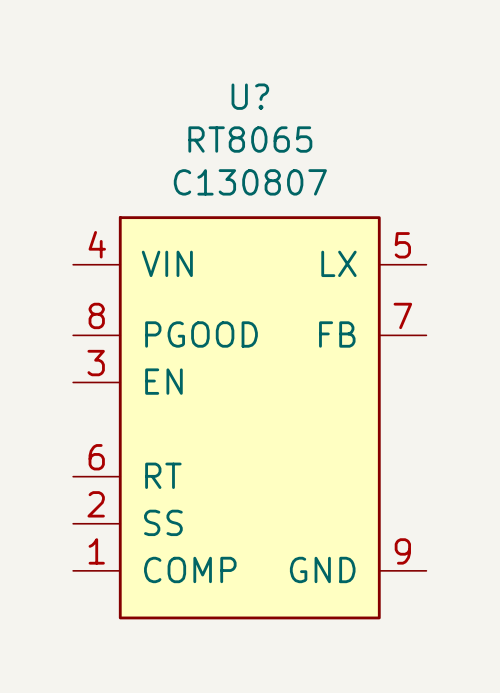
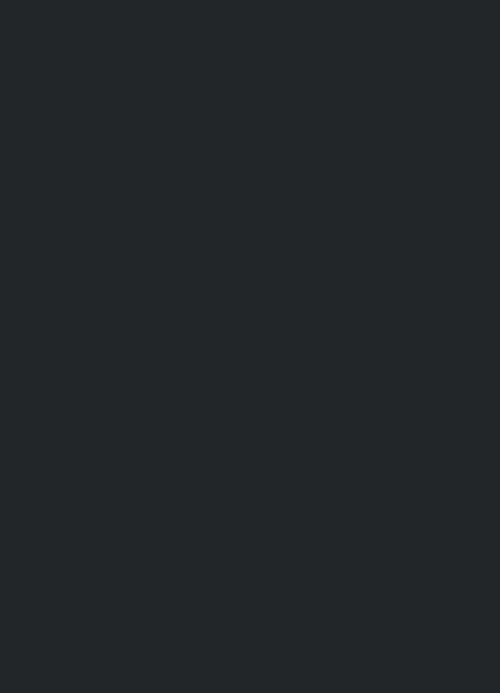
U?: RT8065 (249, 417) -> none

